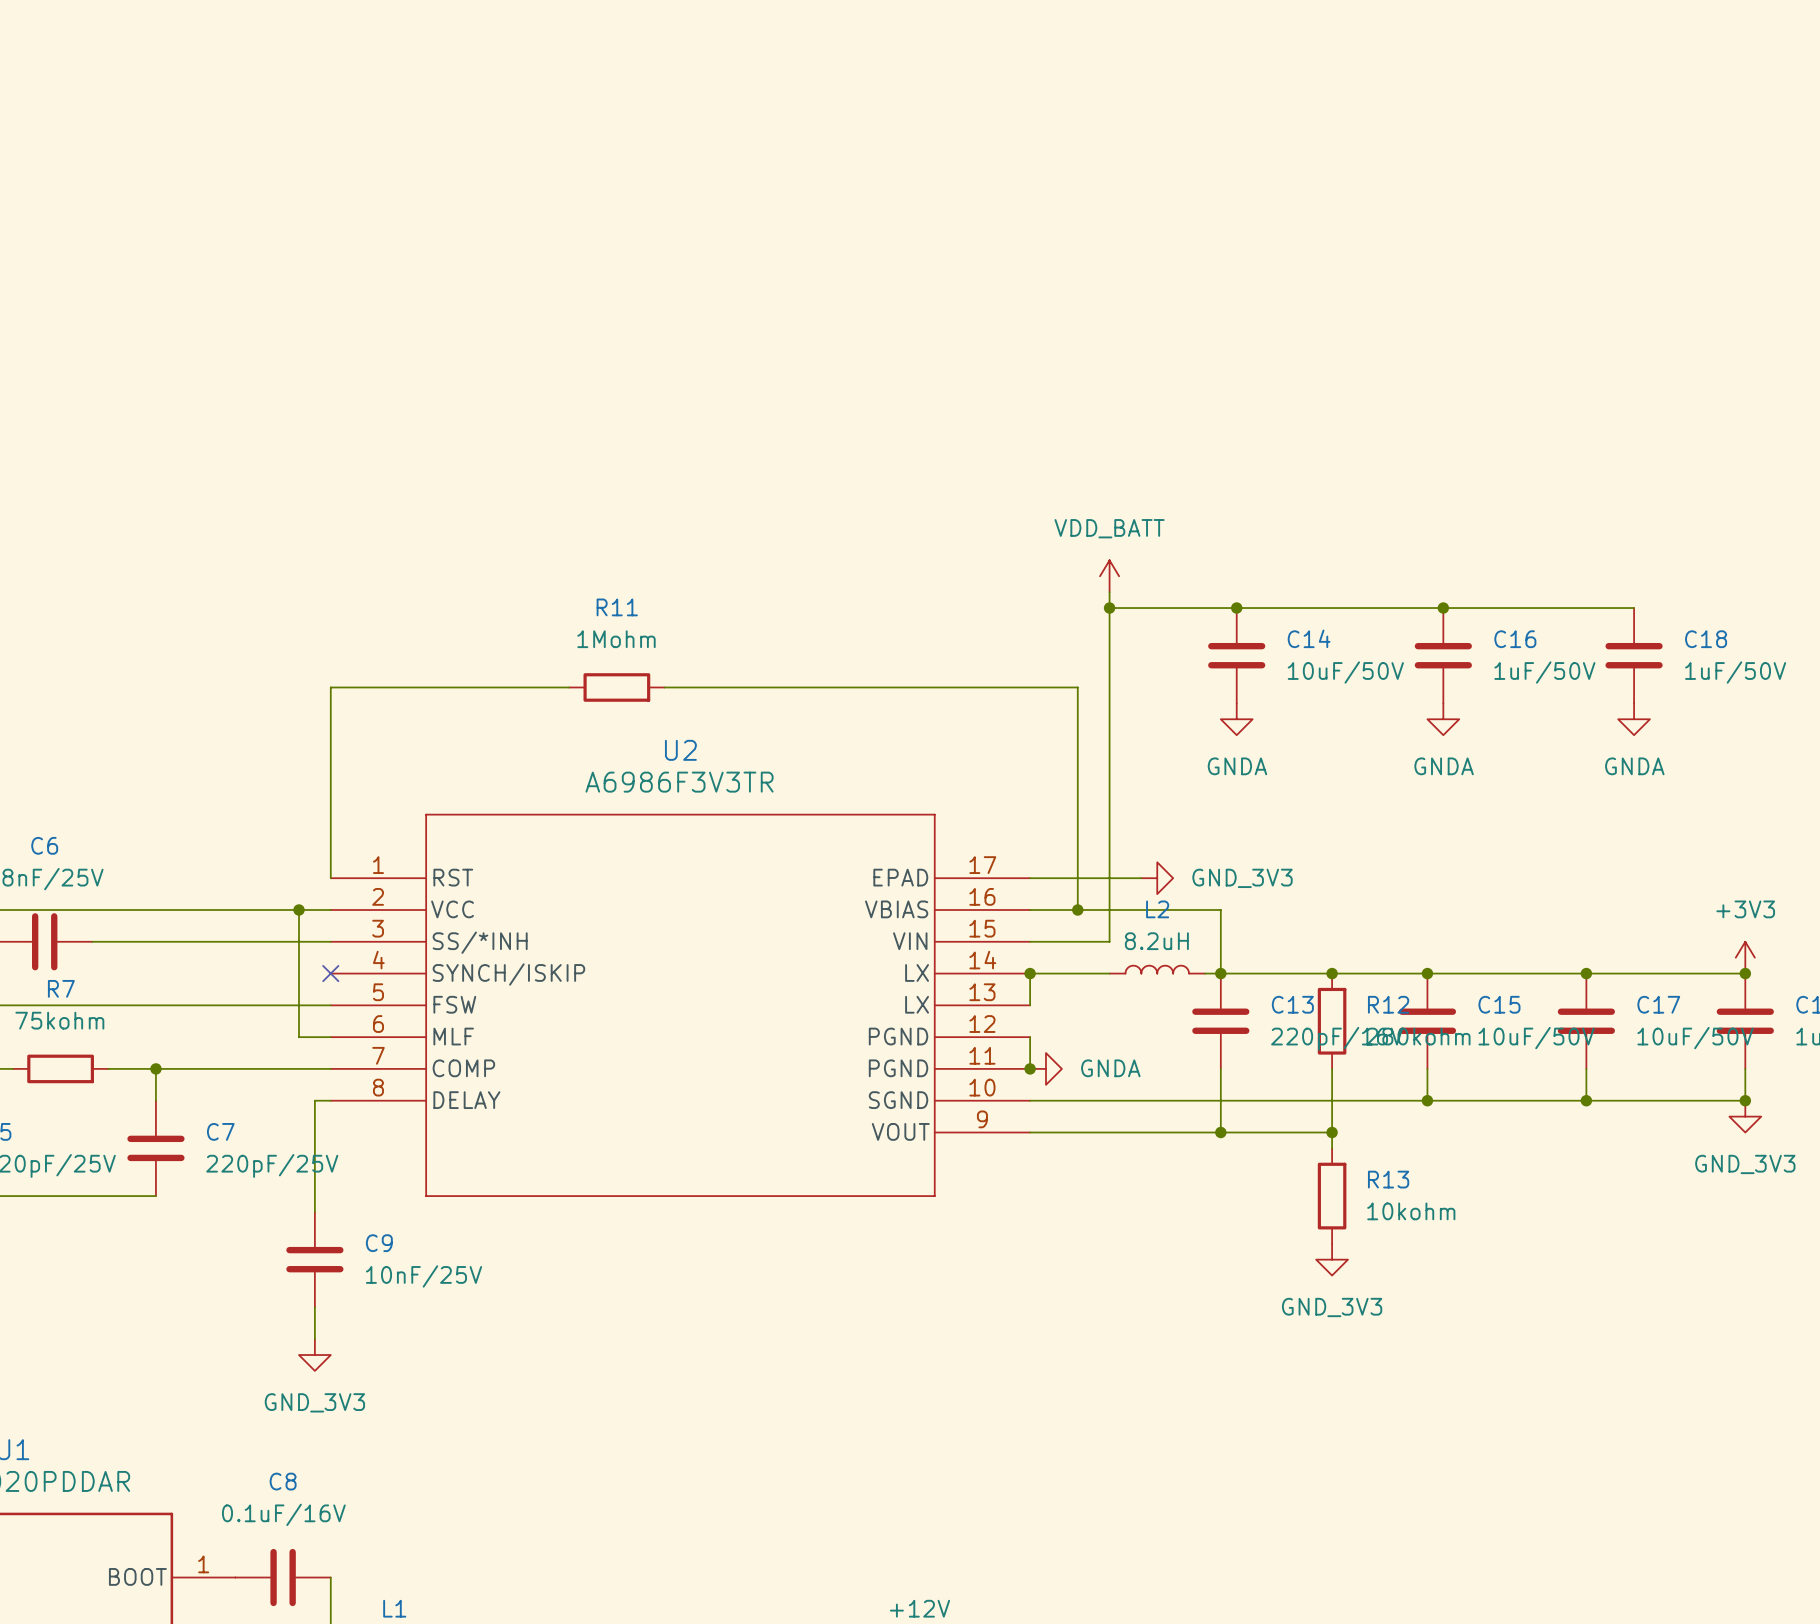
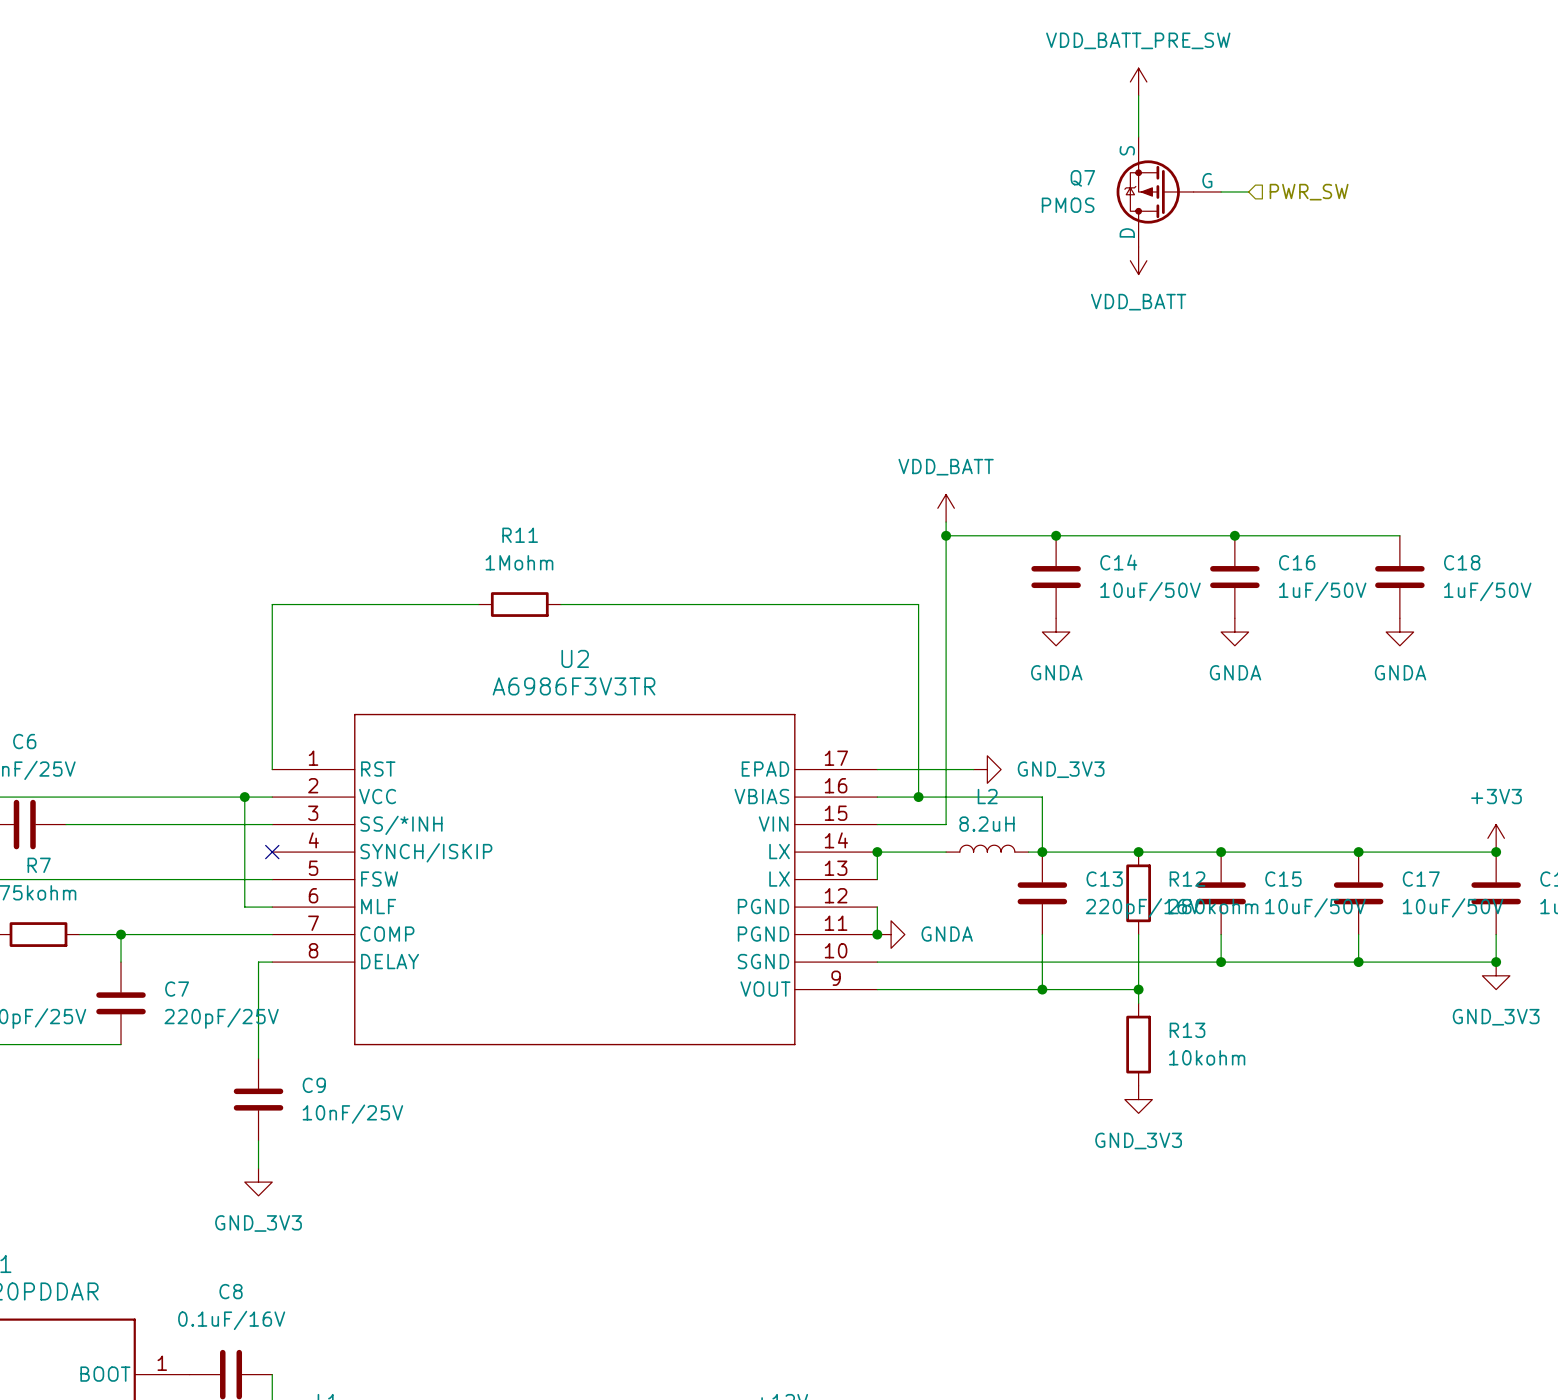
power symbol: none -> VDD_BATT_PRE_SW (1138, 81)
wire: none -> (1138, 95) (1138, 136)
Q7: none -> PMOS (1168, 191)
wire: none -> (1221, 191) (1248, 191)
hierarchical label: none -> PWR_SW (1309, 192)
power symbol: none -> VDD_BATT (1138, 260)

